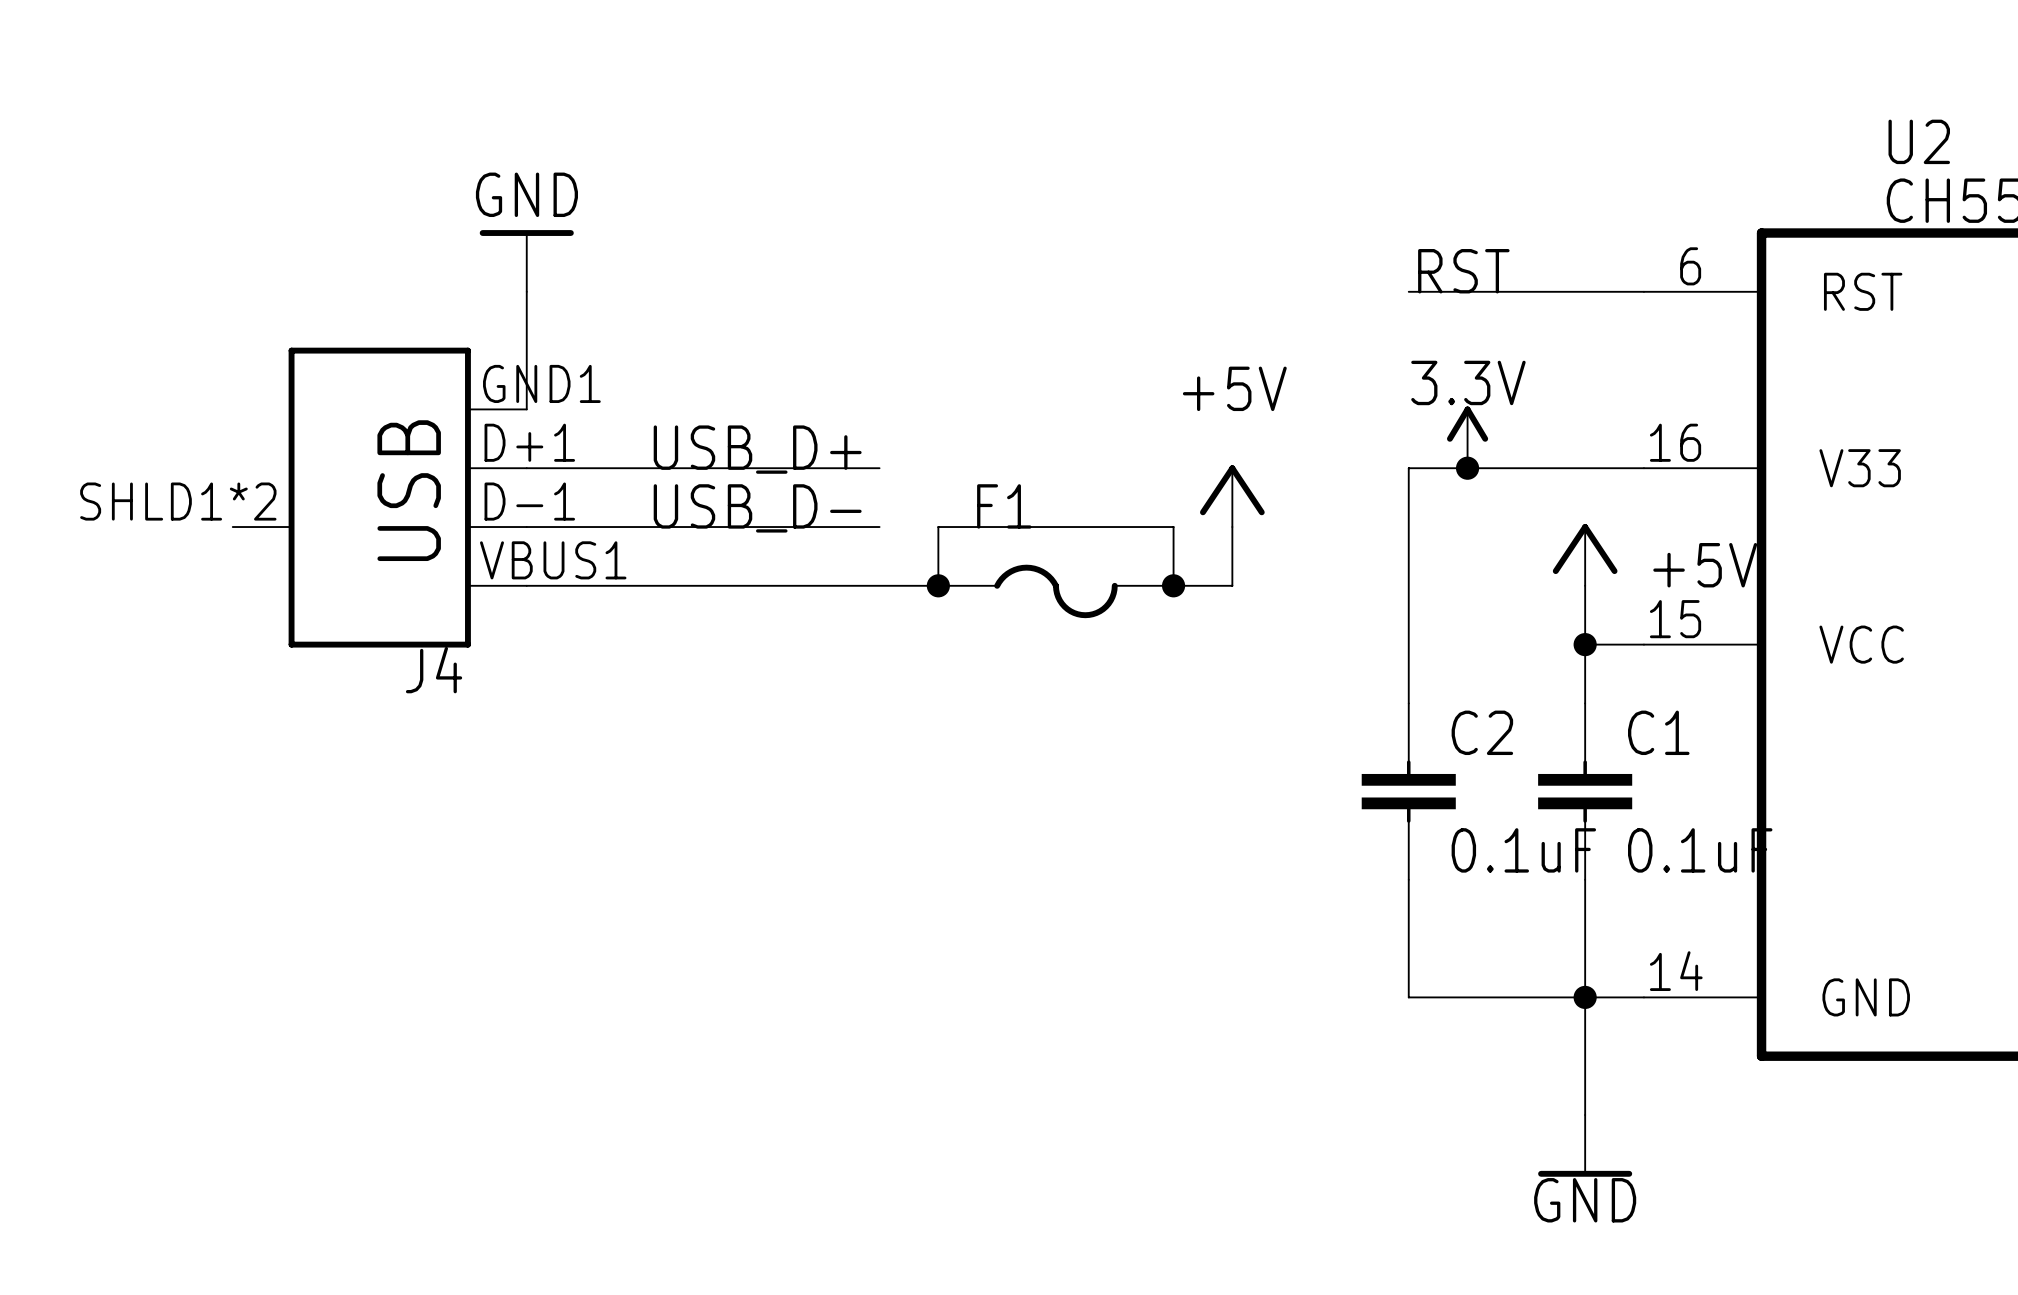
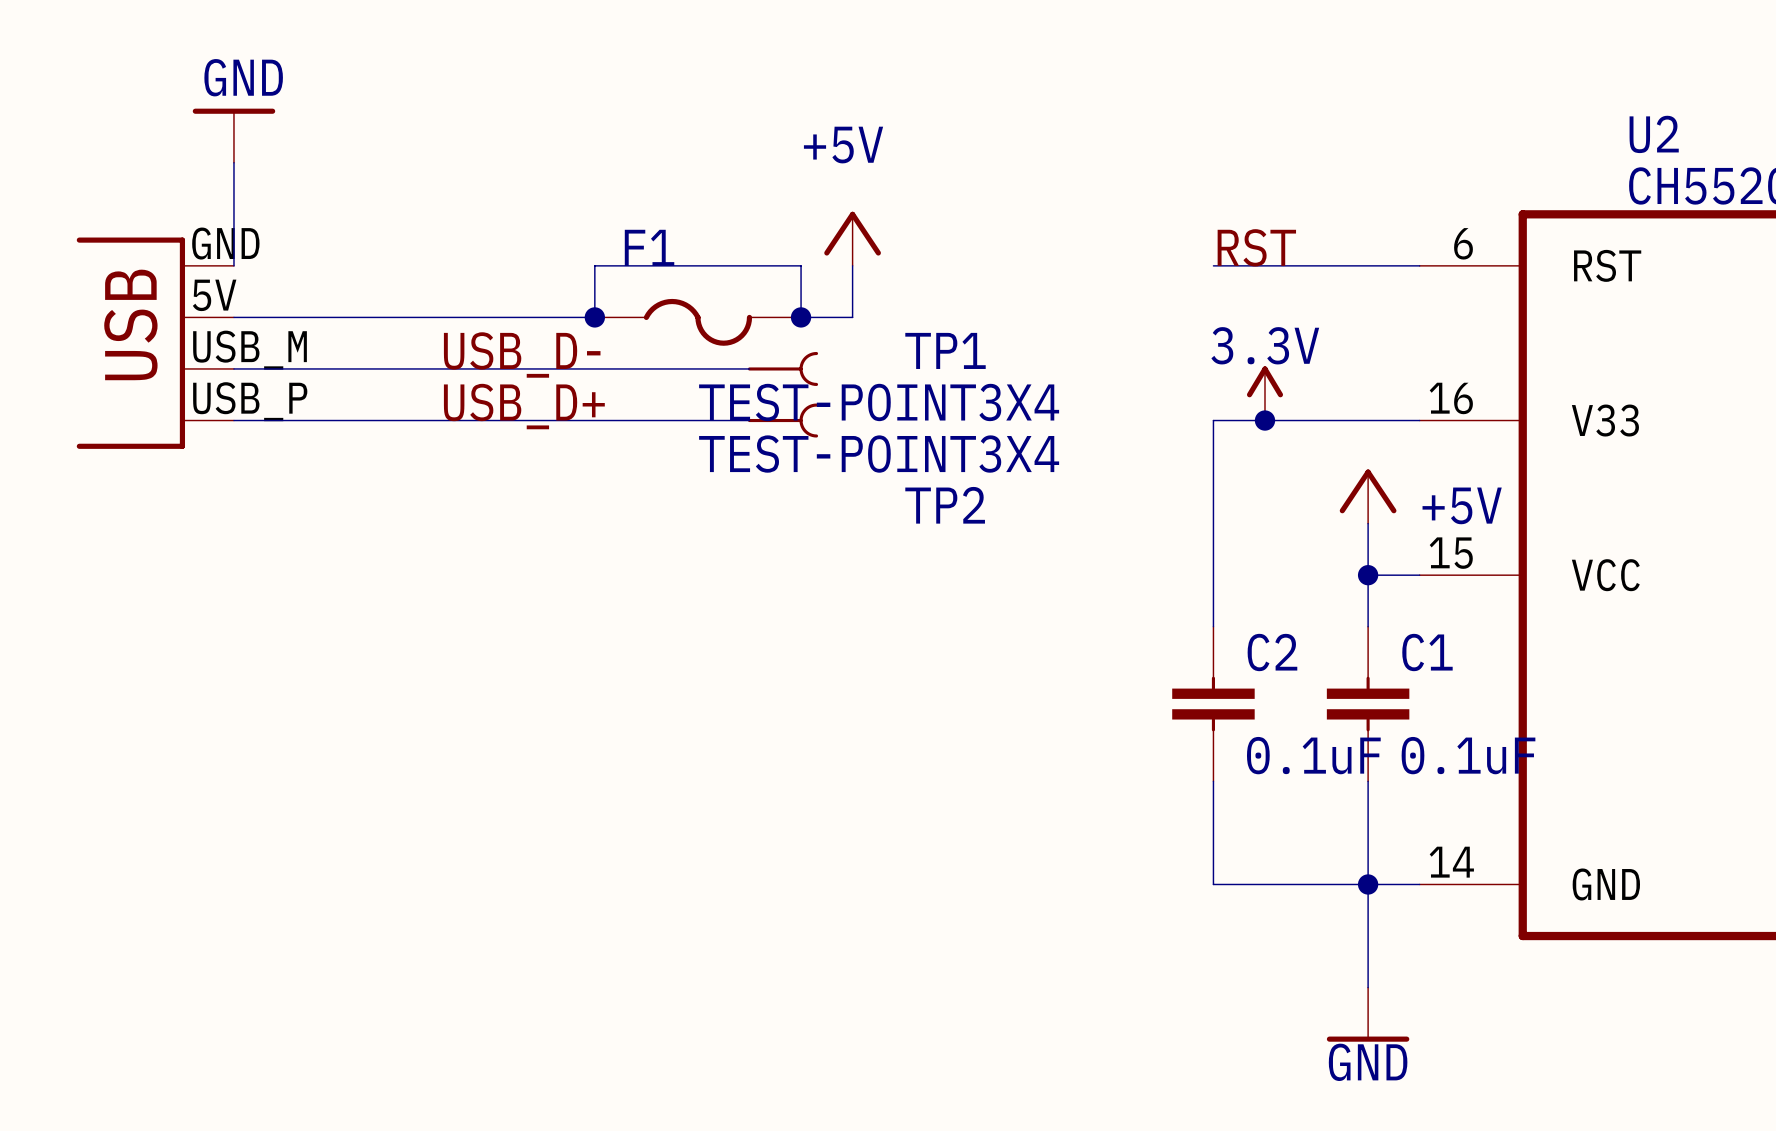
power symbol position: GND (526, 260) -> GND (233, 135)
wire: (526, 291) (526, 409) -> (233, 162) (233, 265)
junction: none -> (594, 317)
junction: none -> (801, 317)
part: none -> (155, 343)
wire: none -> (233, 368) (749, 368)
TP1: none -> TEST-POINT3X4 (783, 368)
label position: USB_D+ (757, 449) -> USB_D+ (524, 406)
wire: none -> (233, 420) (440, 420)
TP2: none -> TEST-POINT3X4 (783, 420)
power symbol position: +5V (1232, 496) -> +5V (852, 238)
J4: (379, 497) -> none
label position: USB_D- (757, 508) -> USB_D- (522, 354)
wire: (526, 527) (879, 527) -> none
wire: (1232, 527) (1232, 585) (1173, 585) (1173, 527) (938, 527) (938, 585) (526, 585) -> (852, 265) (852, 317) (801, 317) (801, 265) (594, 265) (594, 317) (233, 317)
junction: (938, 585) -> none
junction: (1173, 585) -> none
F1 position: (1055, 591) -> (697, 322)

